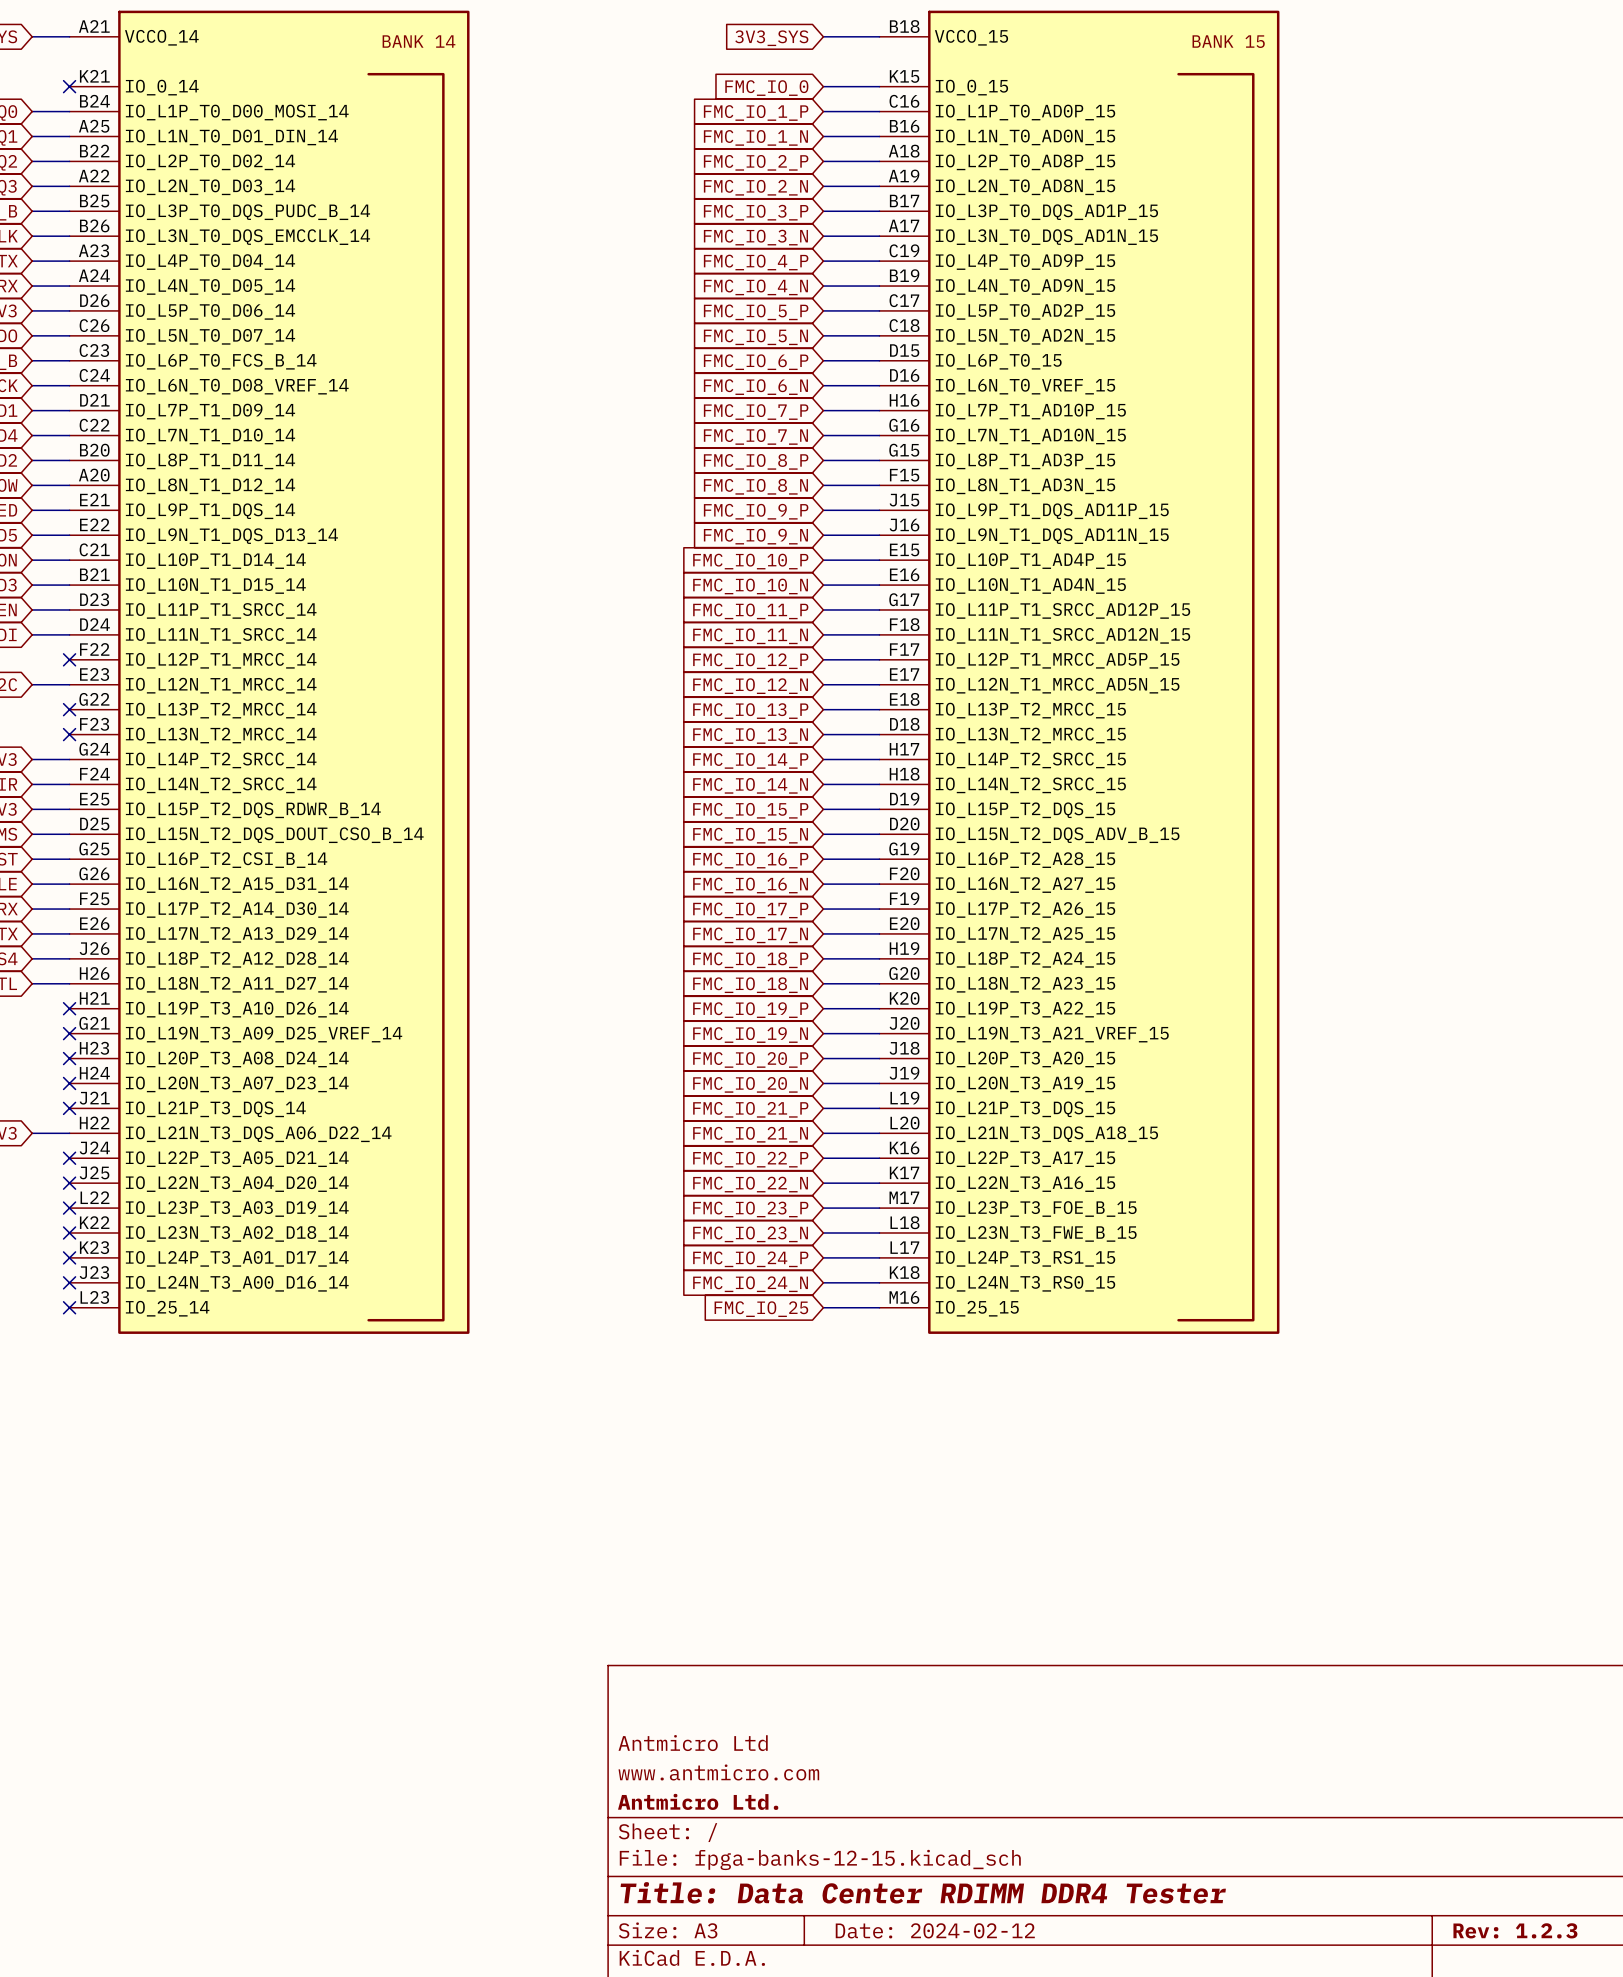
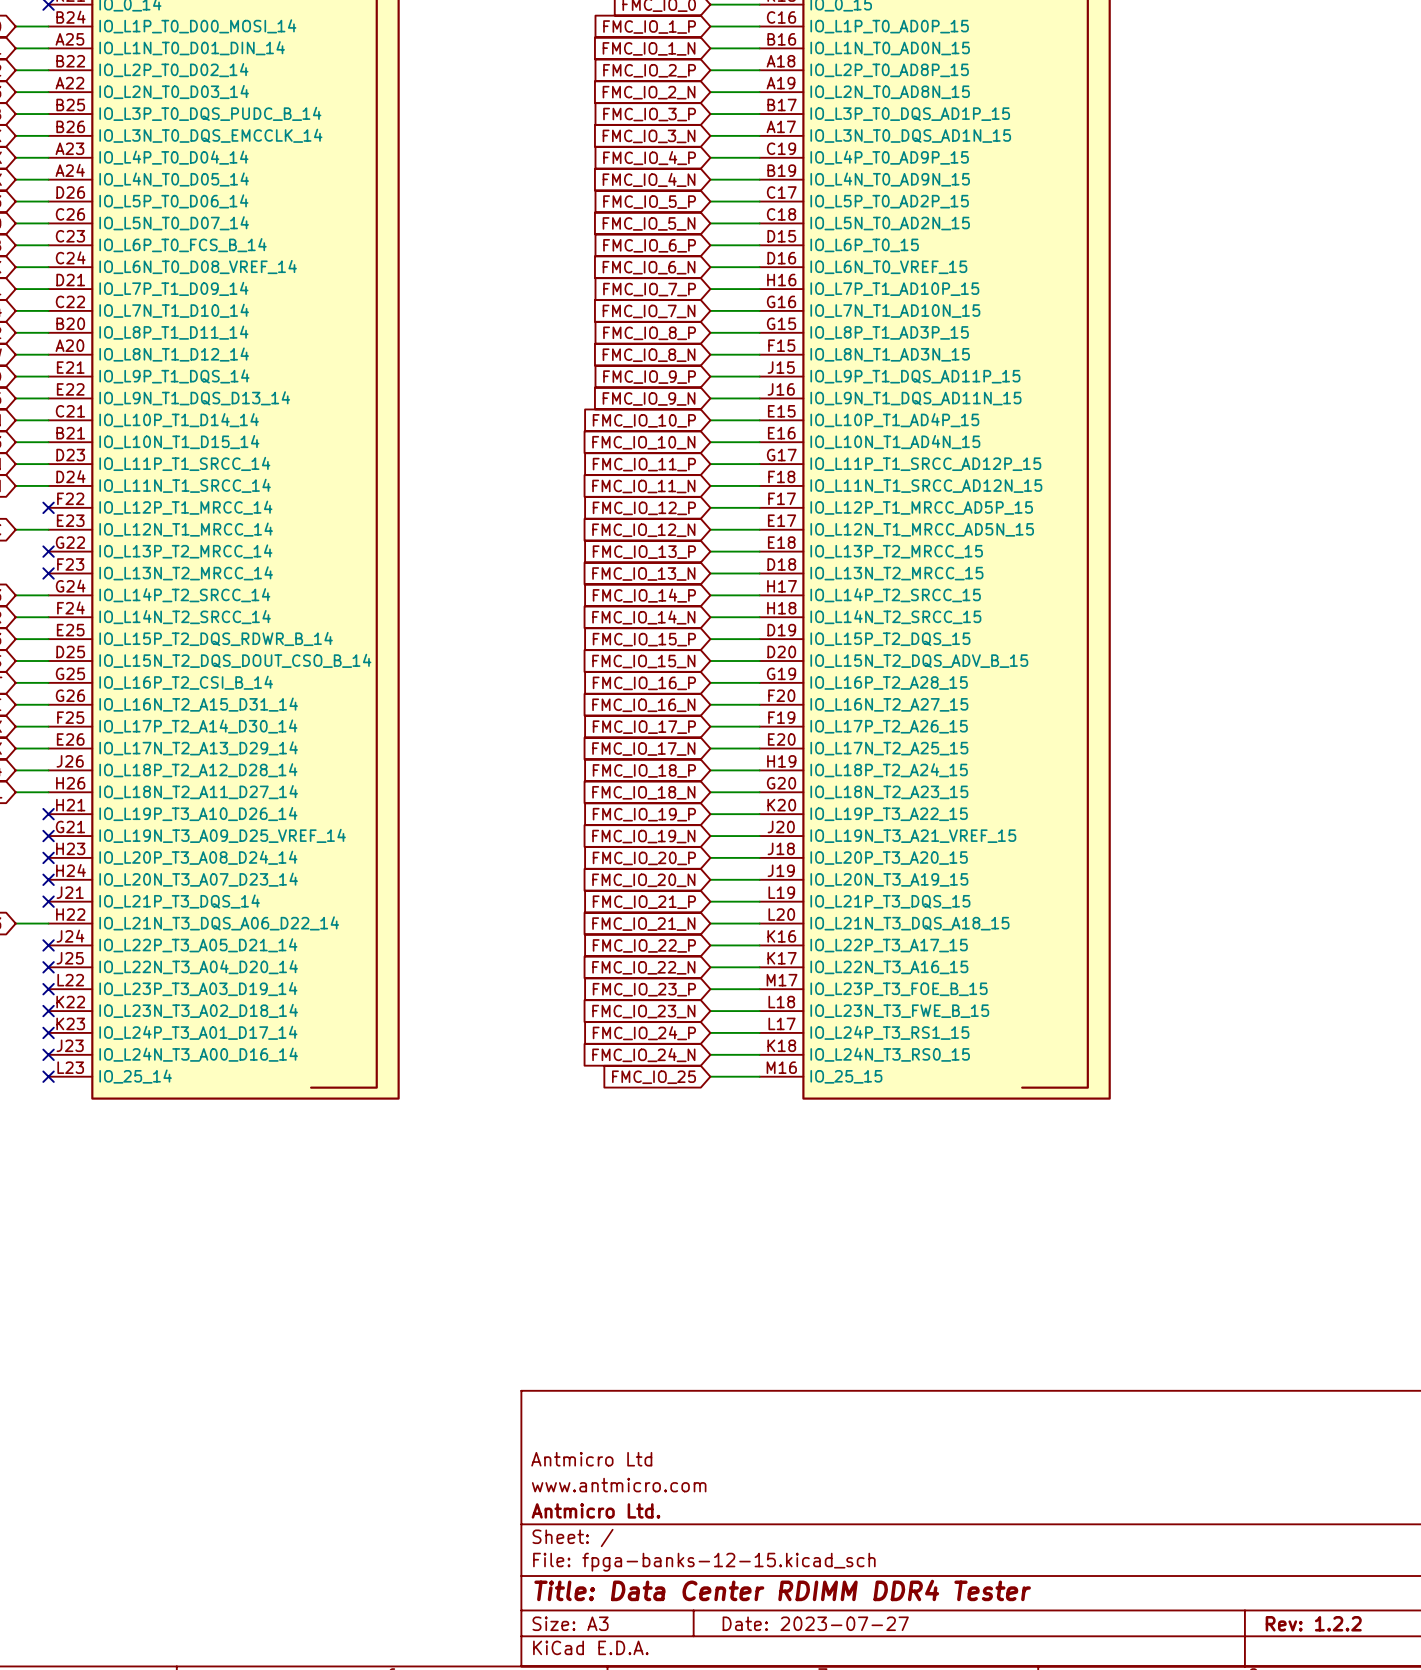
title block: Date: 2024-02-12 (935, 1930) -> Date: 2023-07-27 (815, 1623)
title block: Rev: 1.2.3 (1515, 1930) -> Rev: 1.2.2 (1313, 1623)

